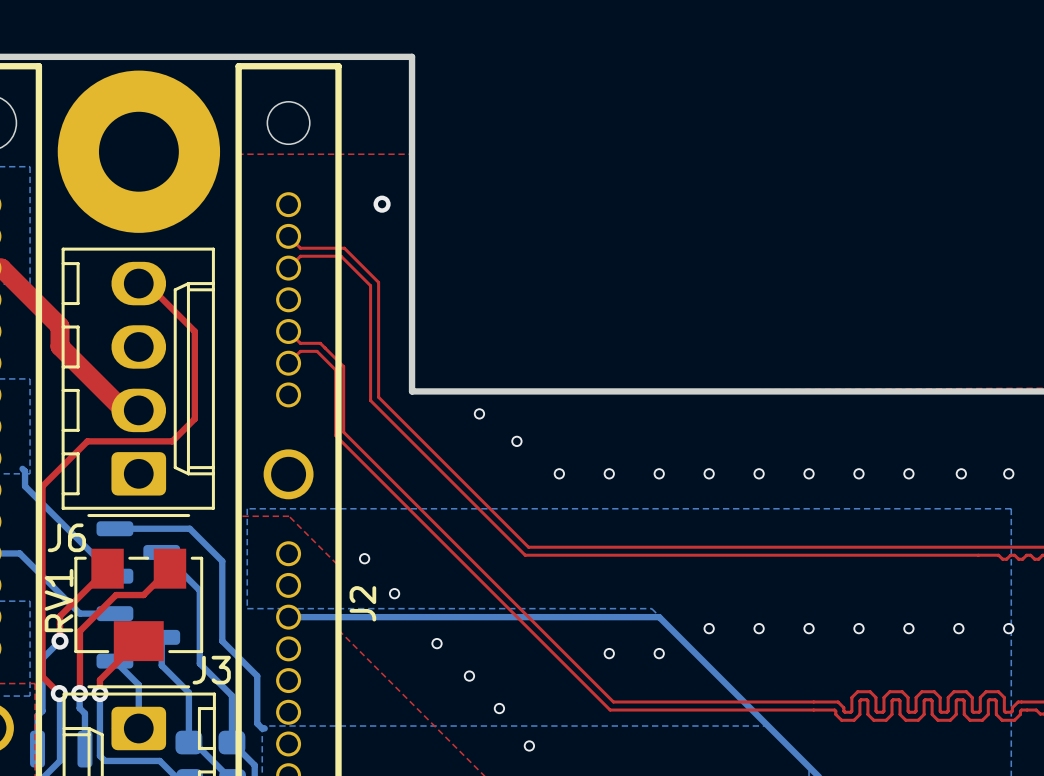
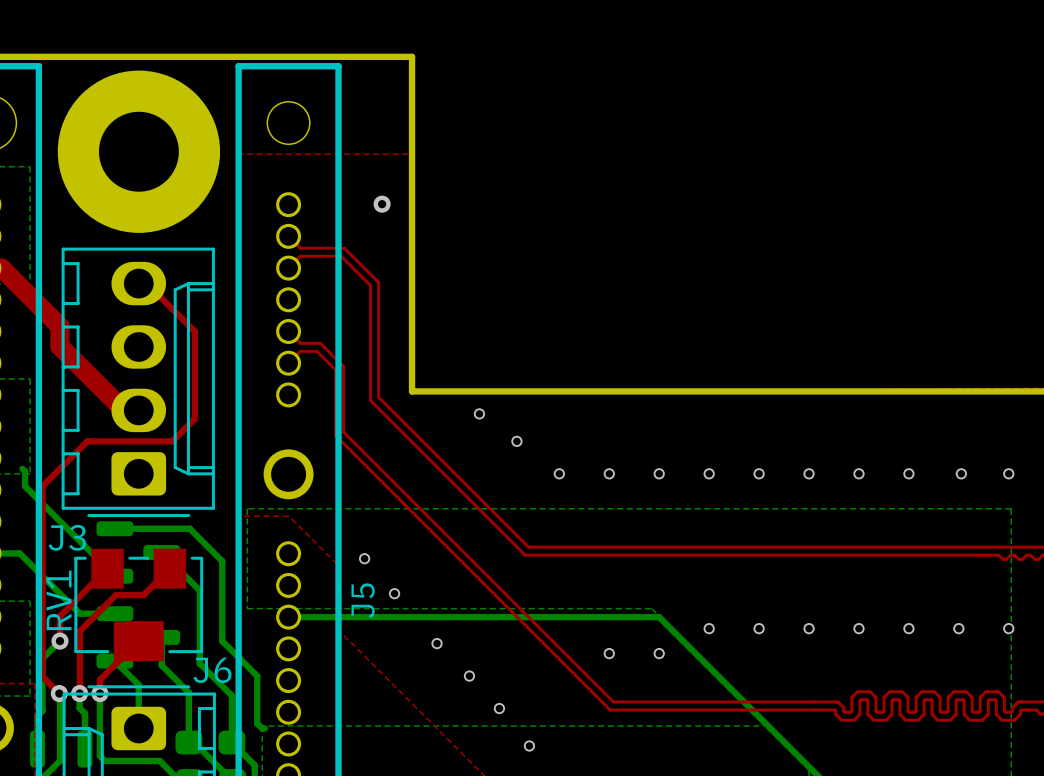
J6 name: J6 (66, 537) -> J3 (67, 537)
J2 name: J2 (362, 603) -> J5 (363, 600)
J3 name: J3 (211, 670) -> J6 (212, 670)

